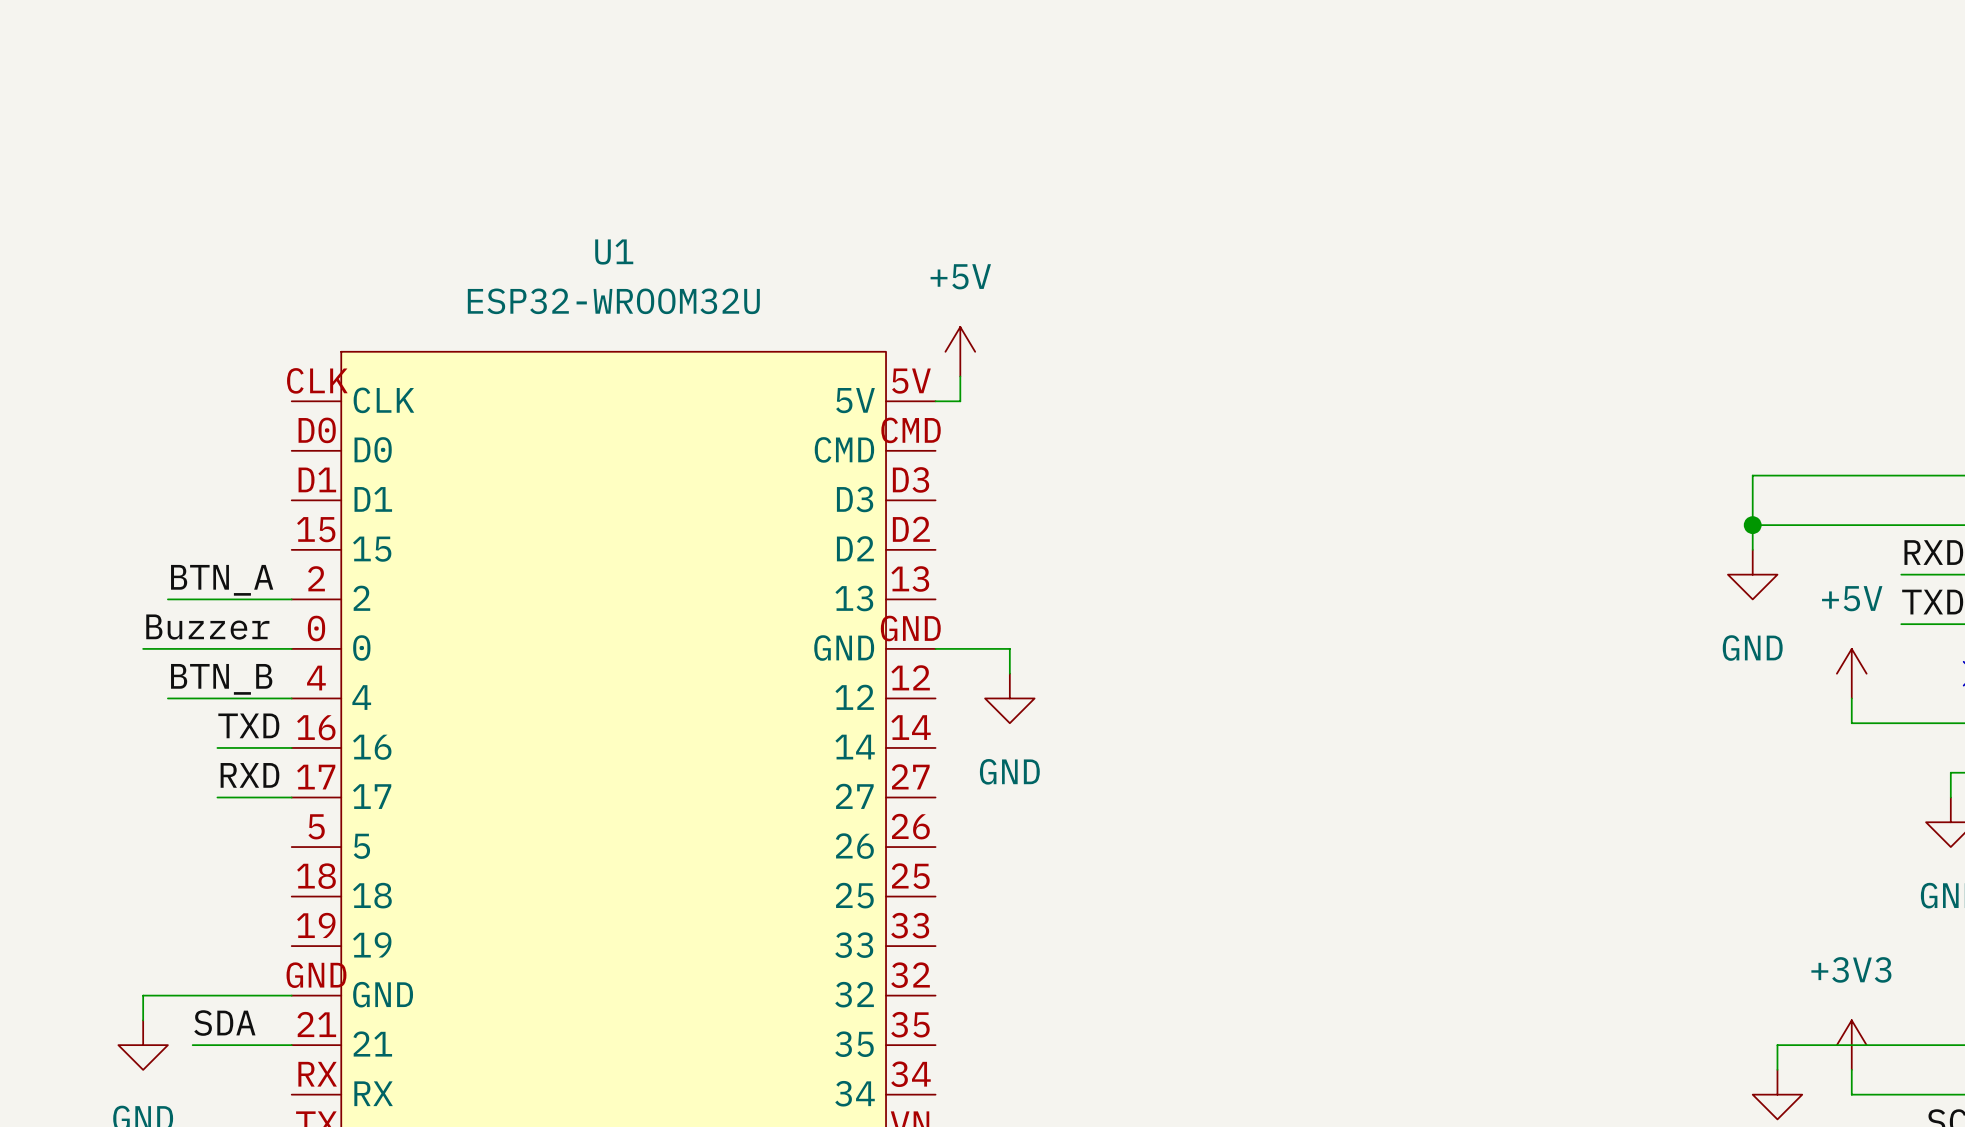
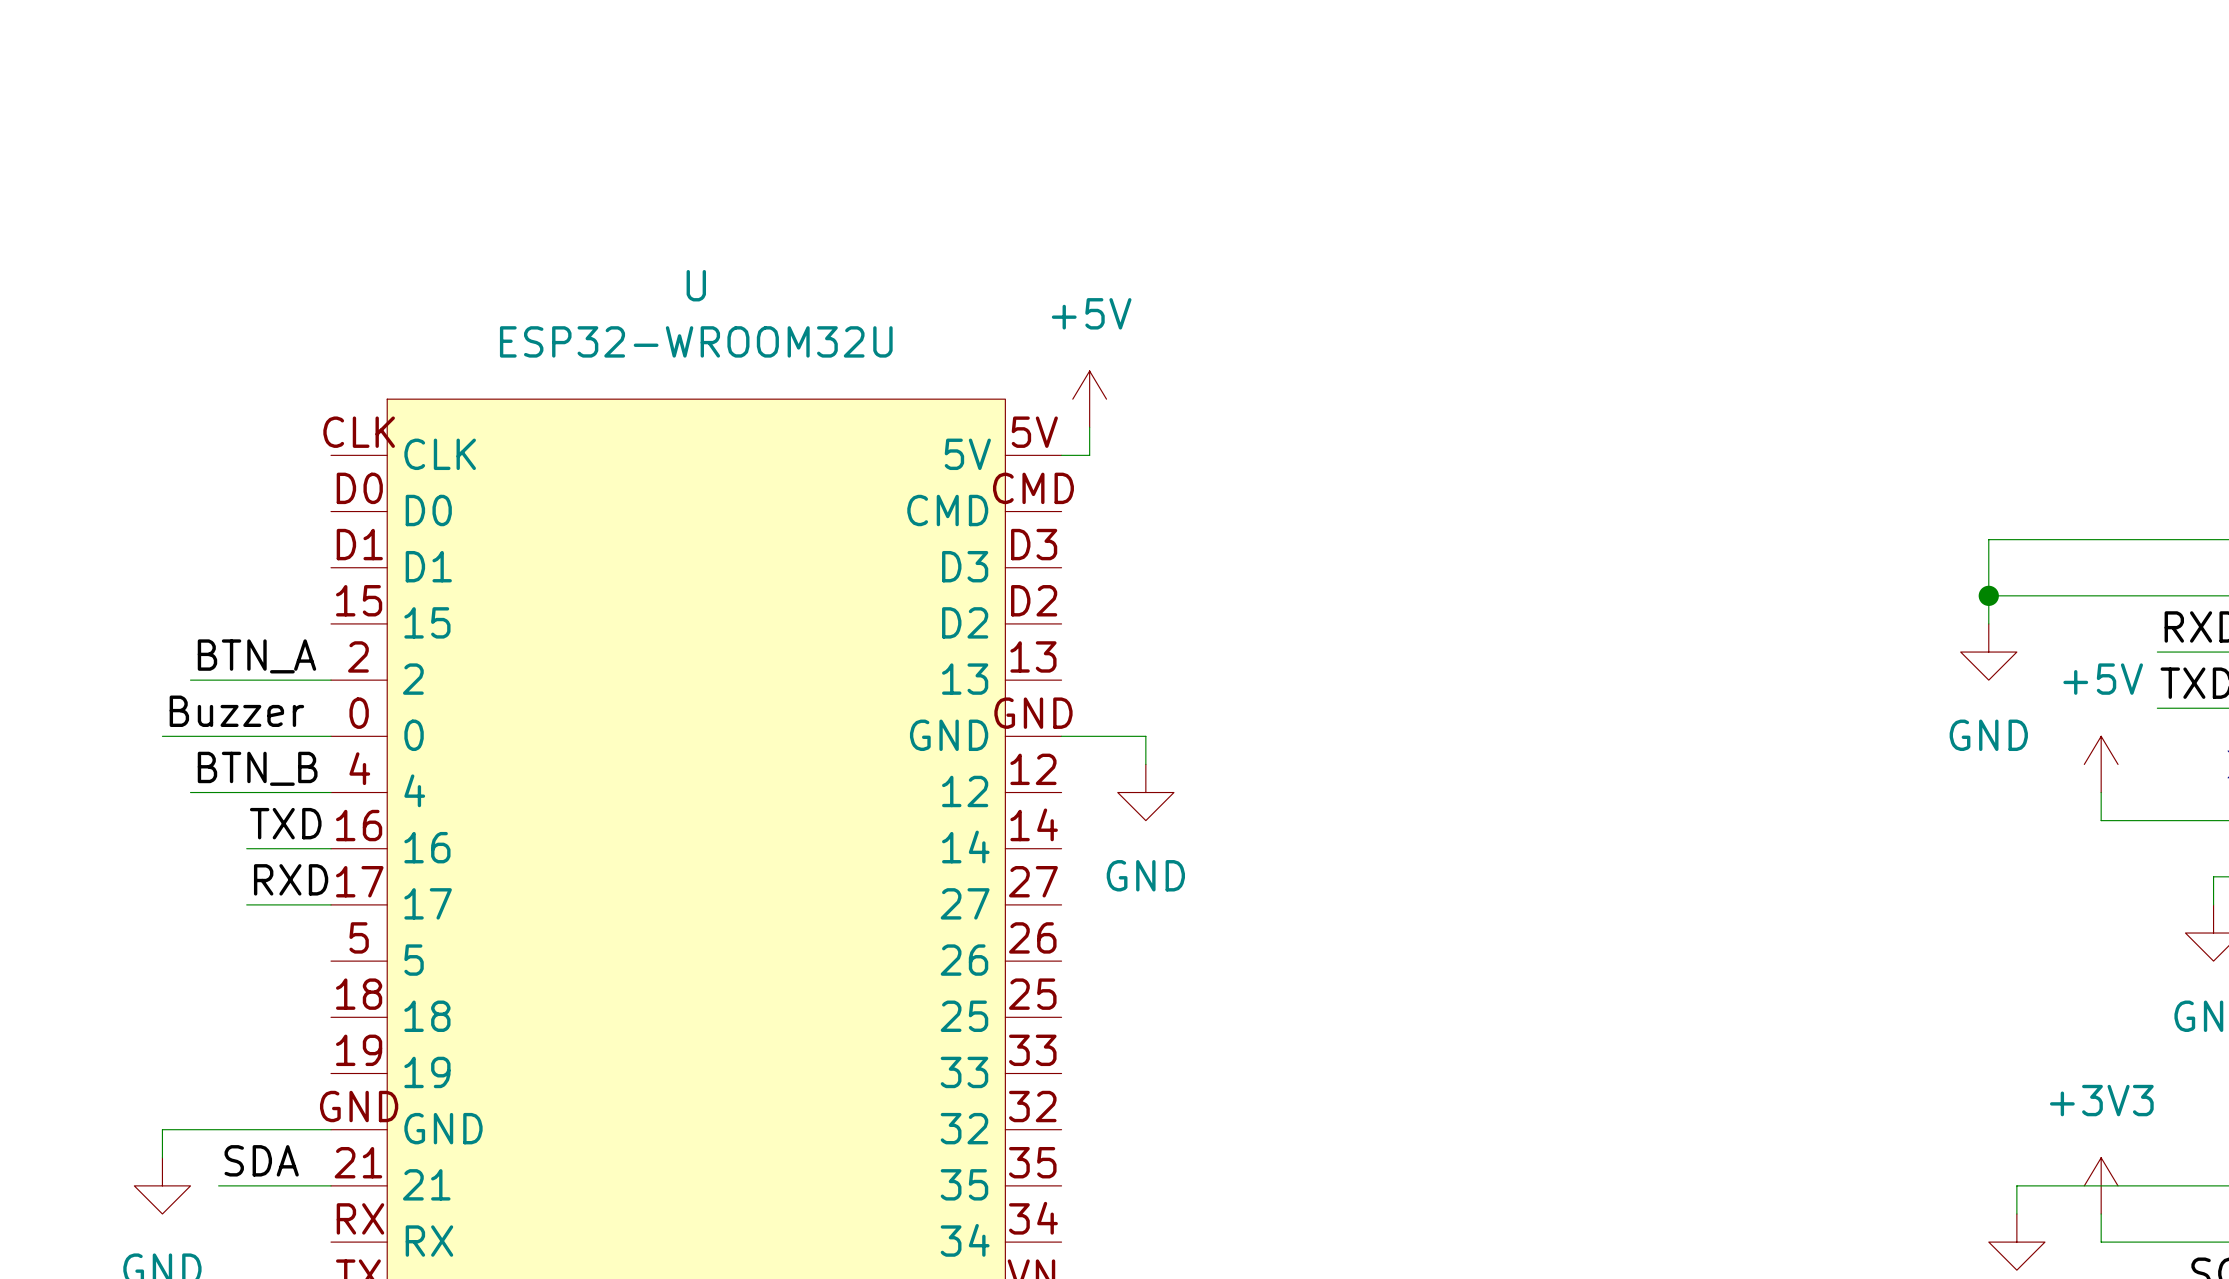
U1 name: U1 (614, 252) -> U (696, 285)

